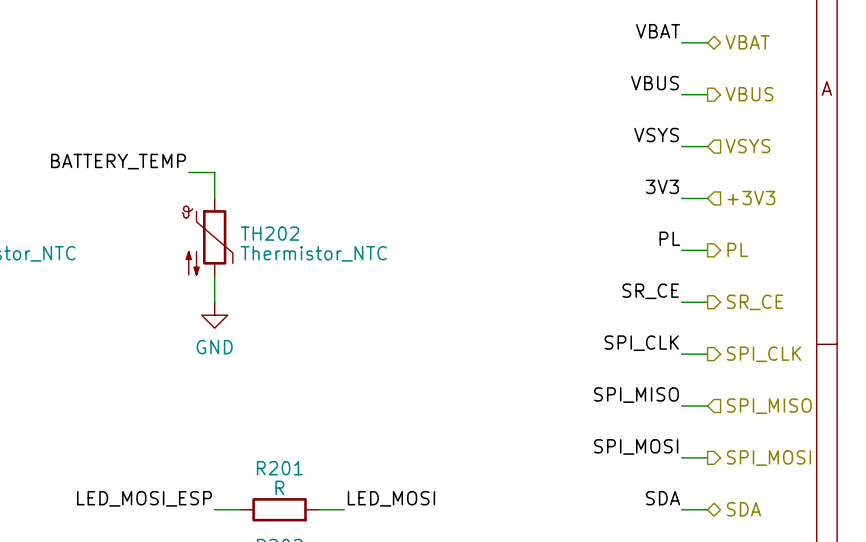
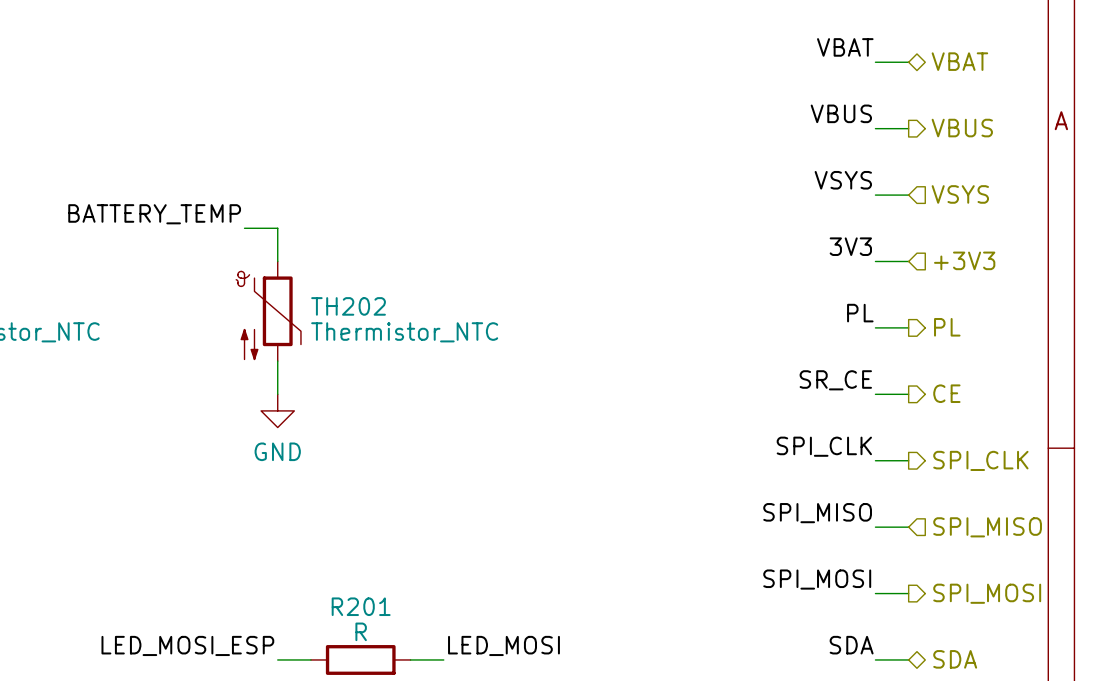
hierarchical label: SR_CE (755, 302) -> CE (946, 393)

